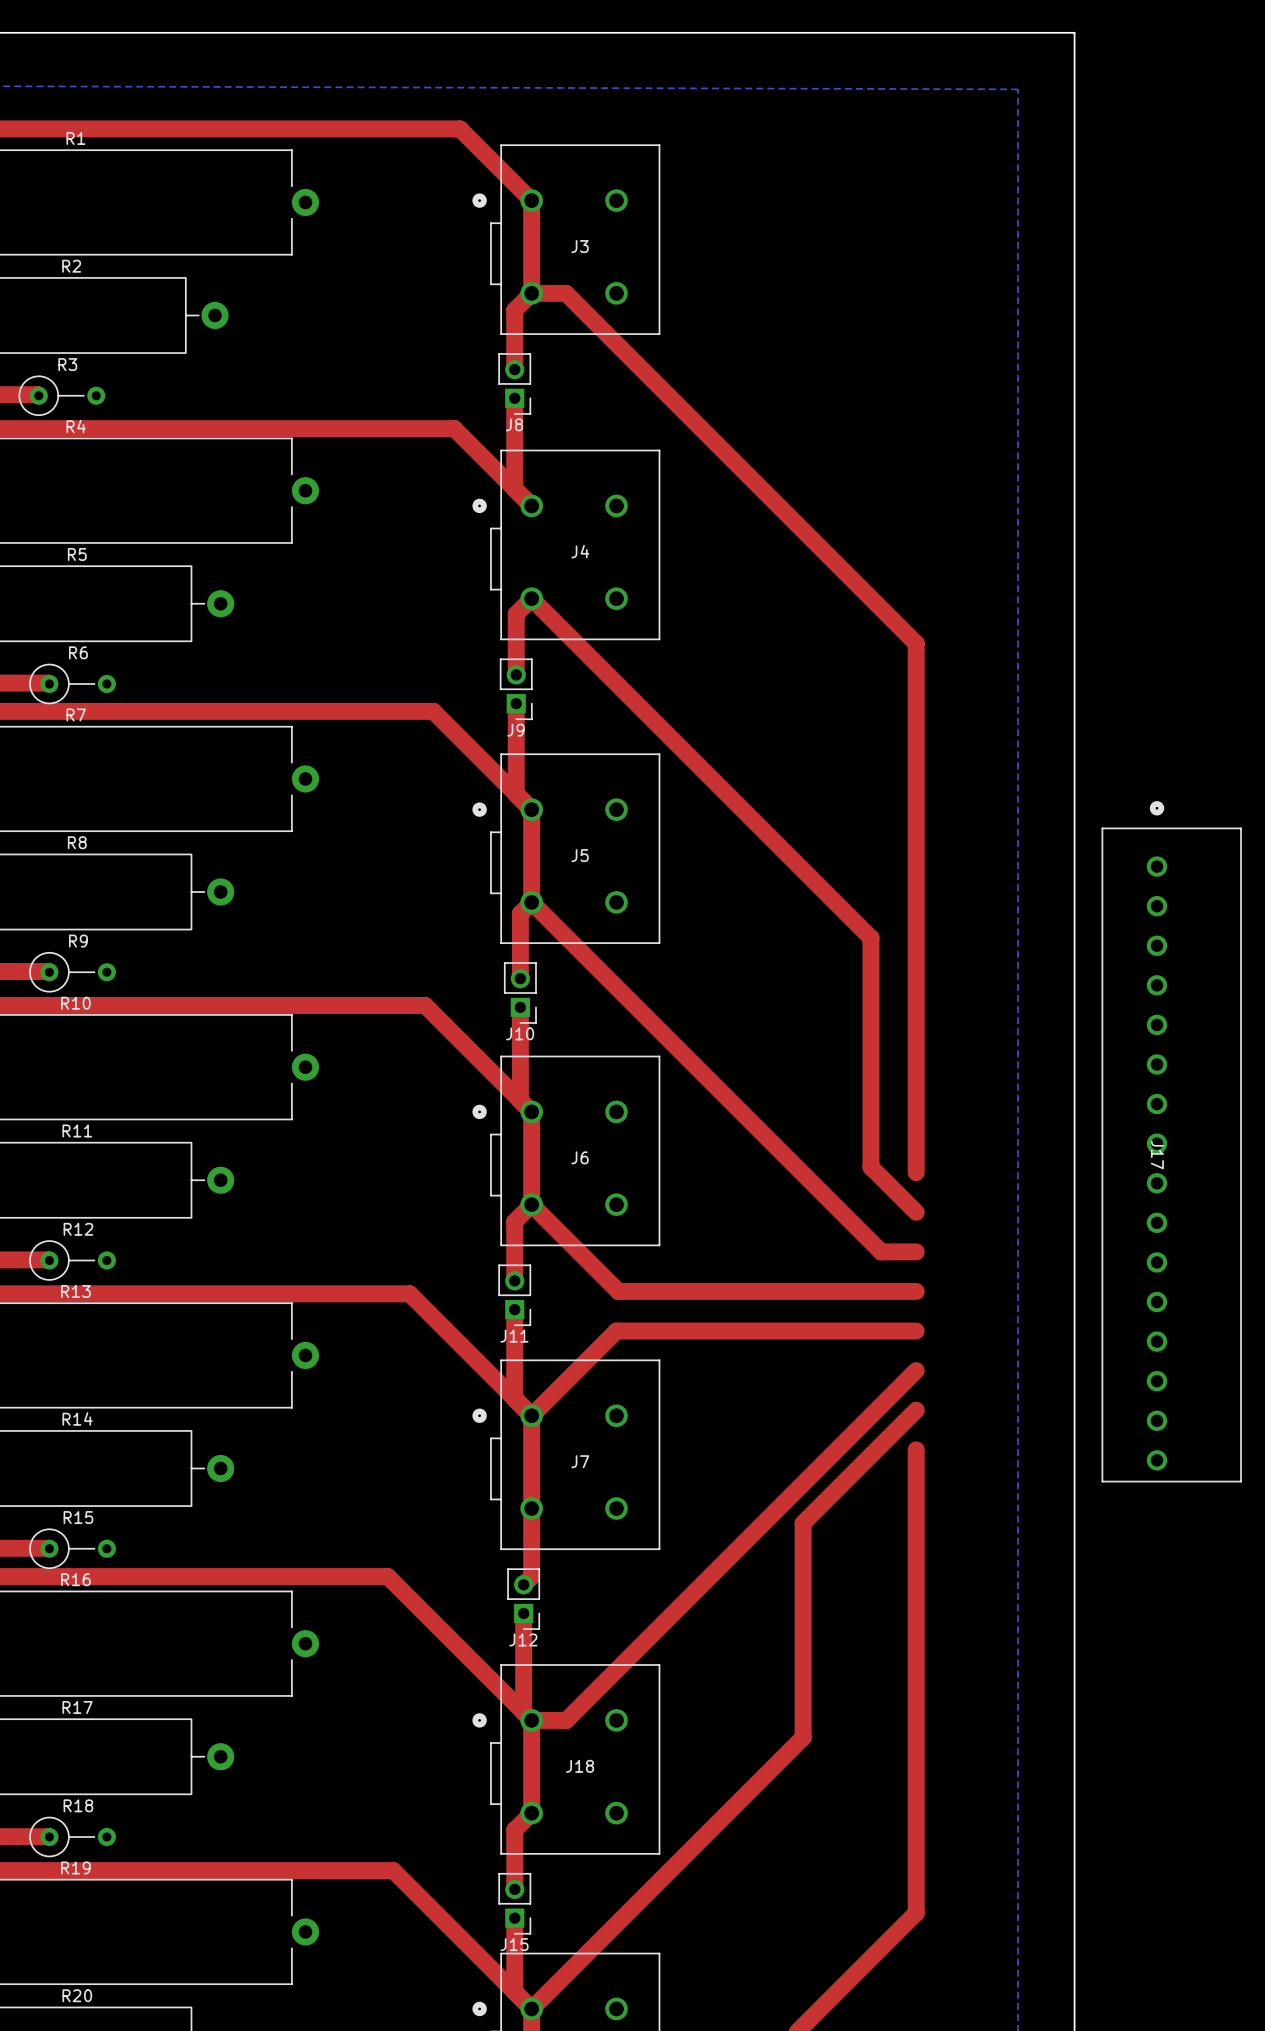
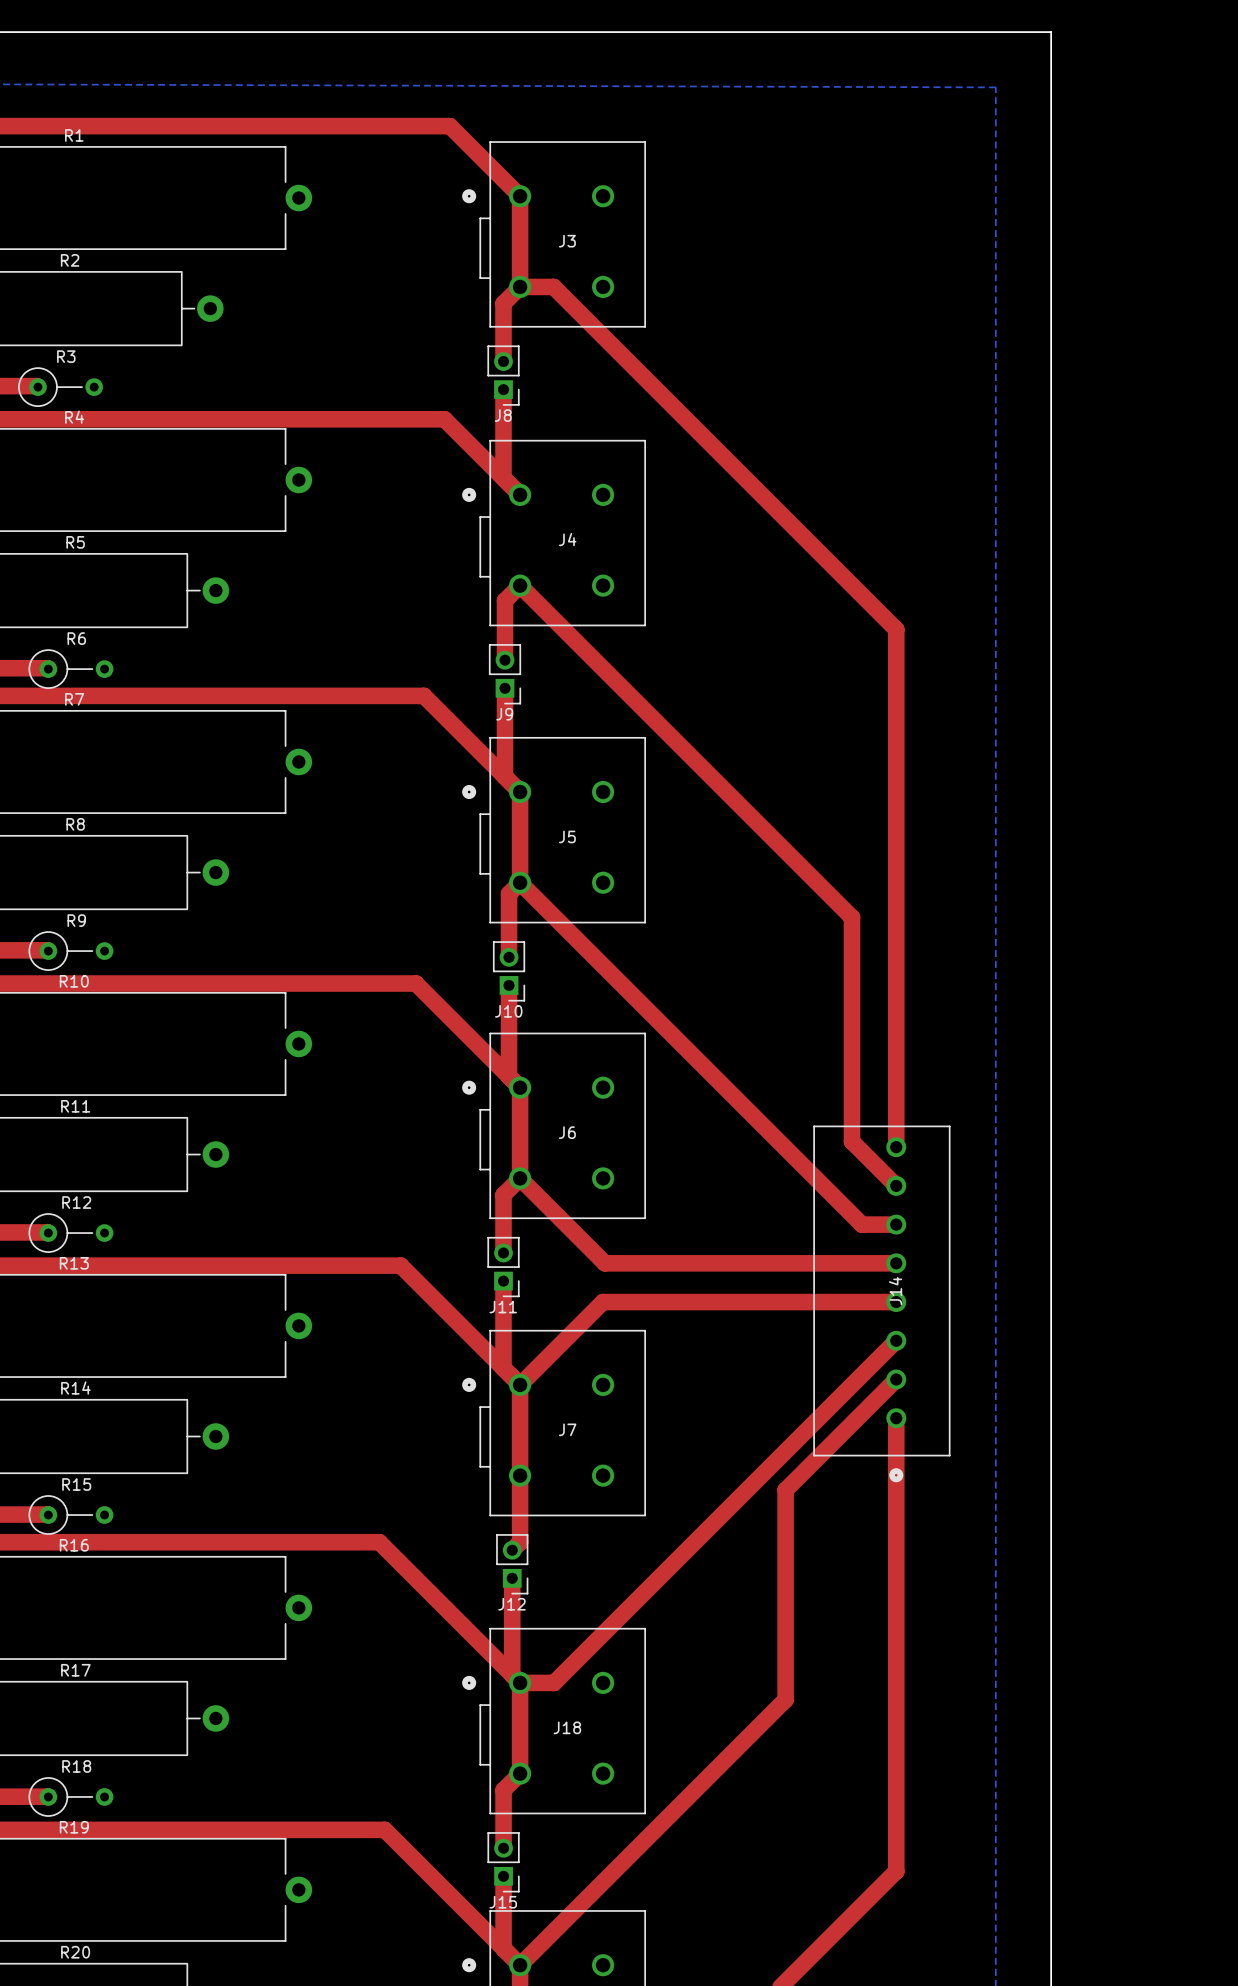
J17: (1171, 1141) -> none
J14: none -> (881, 1303)

